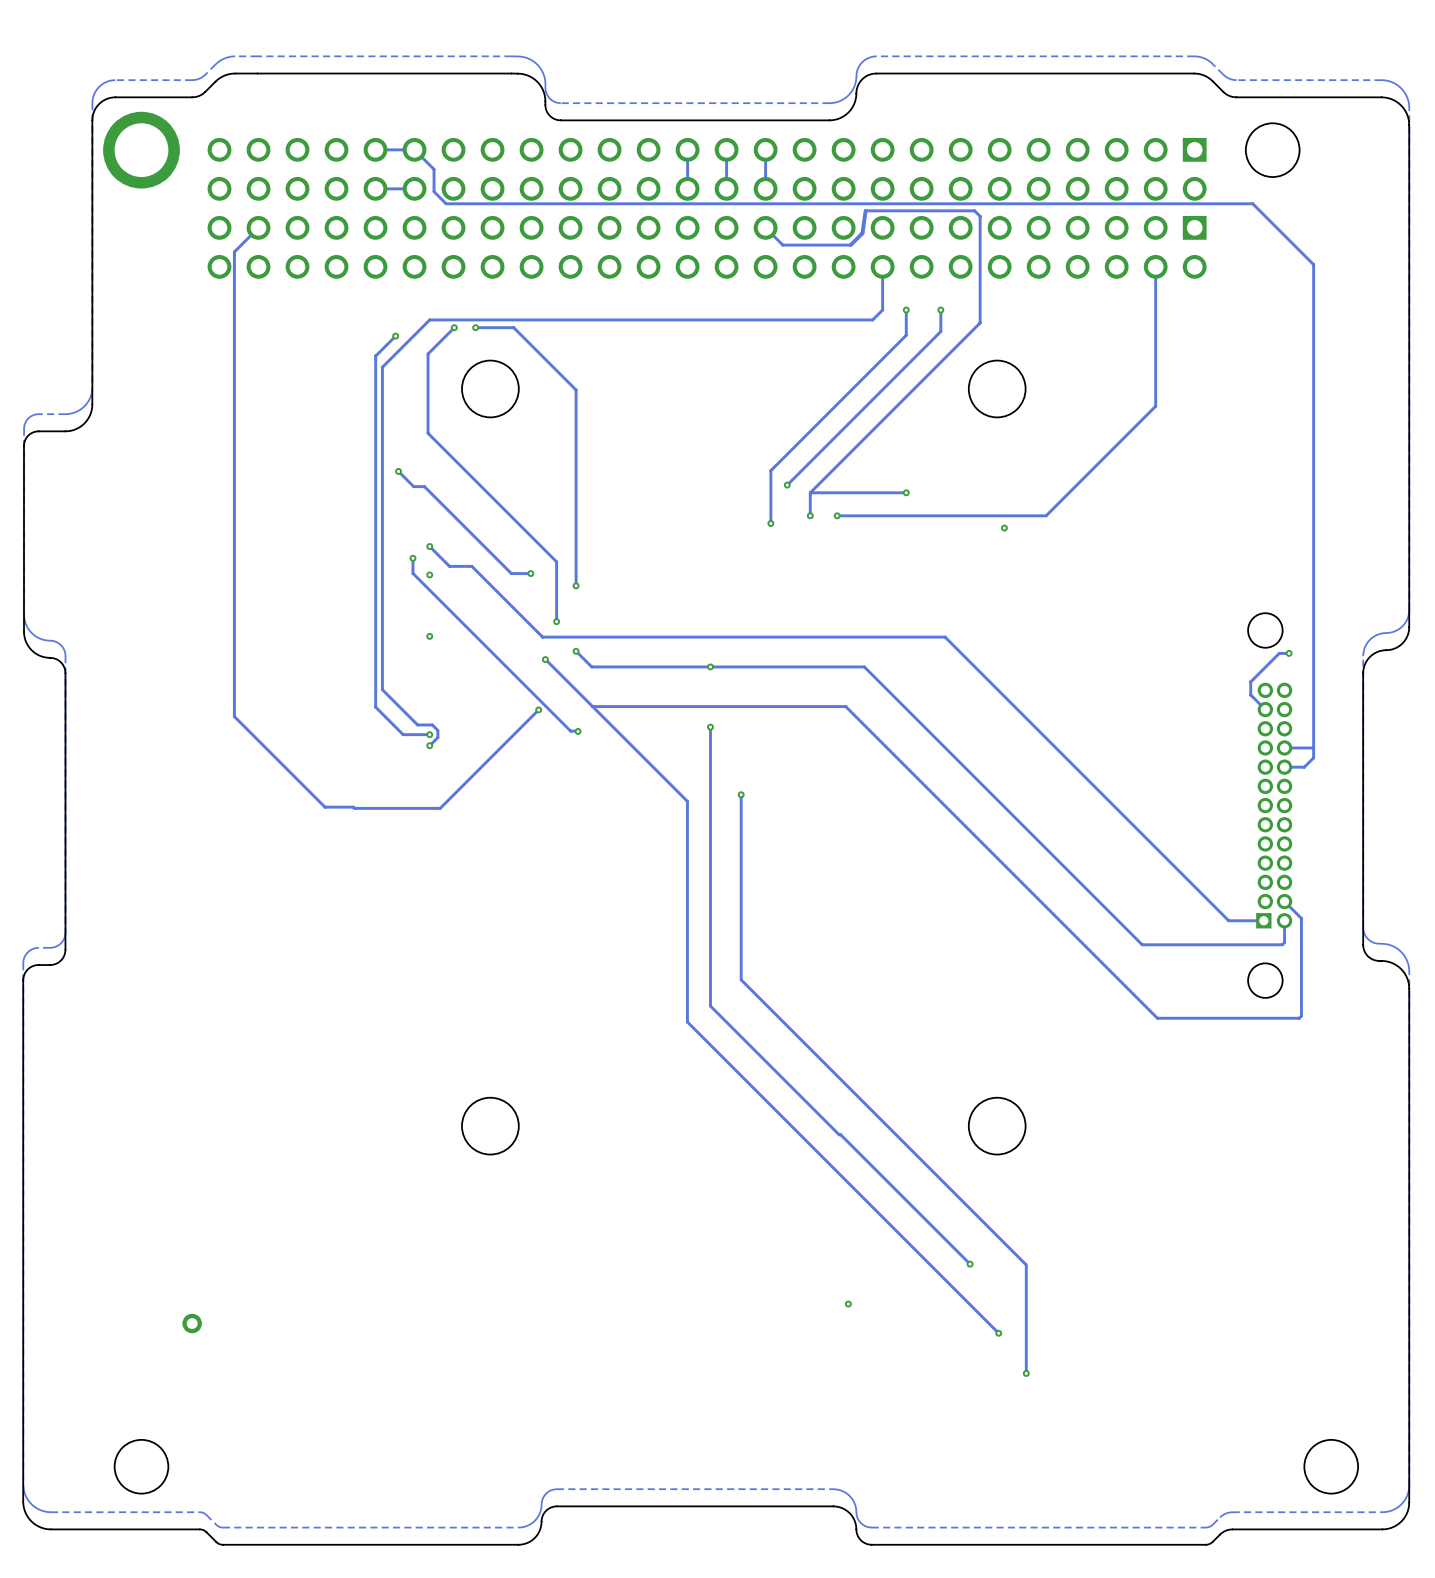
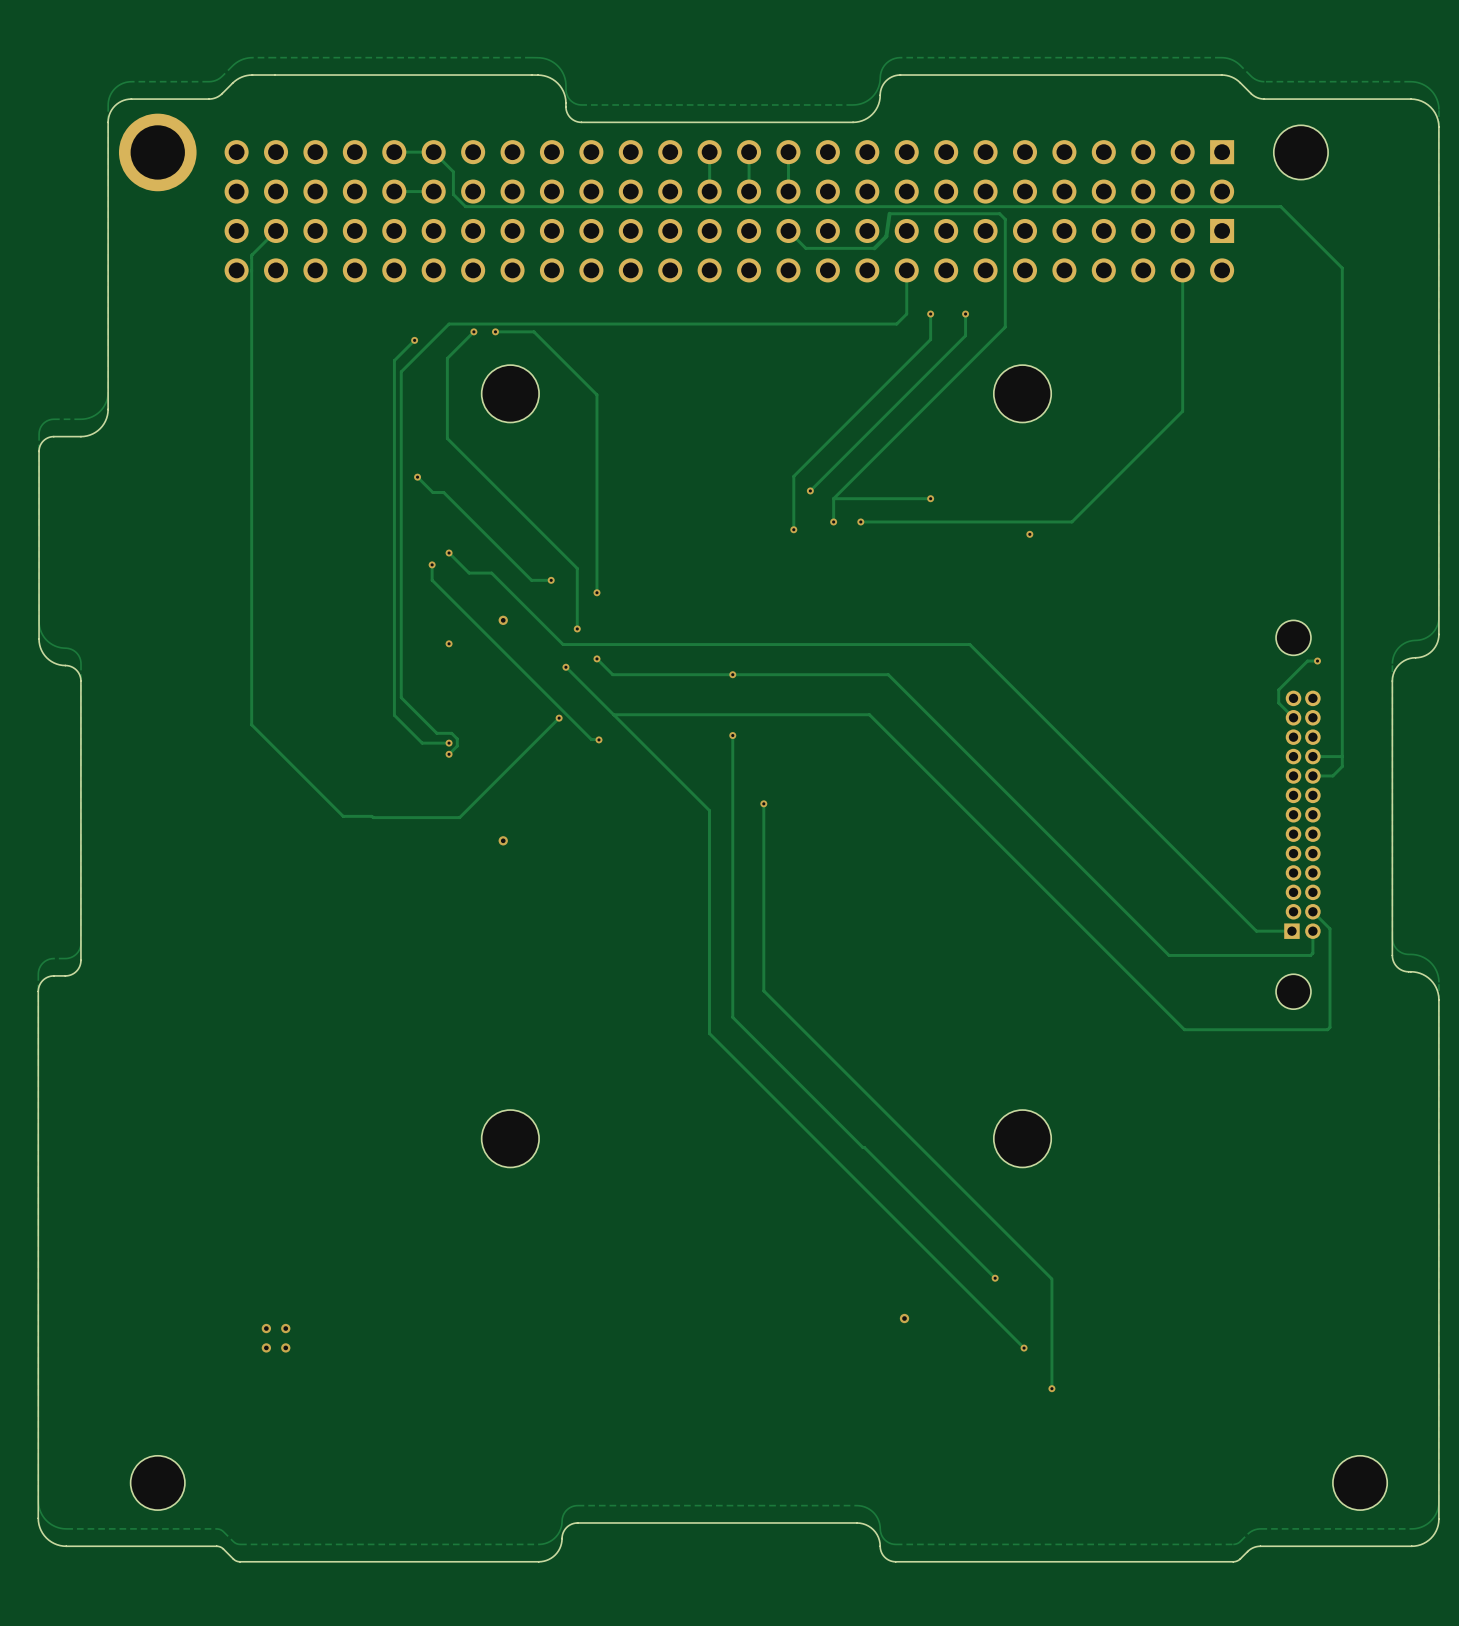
via: (429, 574) -> none
via: none -> (503, 620)
via: none -> (503, 840)
via: (848, 1304) -> none
via: none -> (904, 1318)
via: none -> (266, 1328)
via: none -> (285, 1328)
via: (192, 1323) -> none
via: none -> (266, 1347)
via: none -> (285, 1347)

